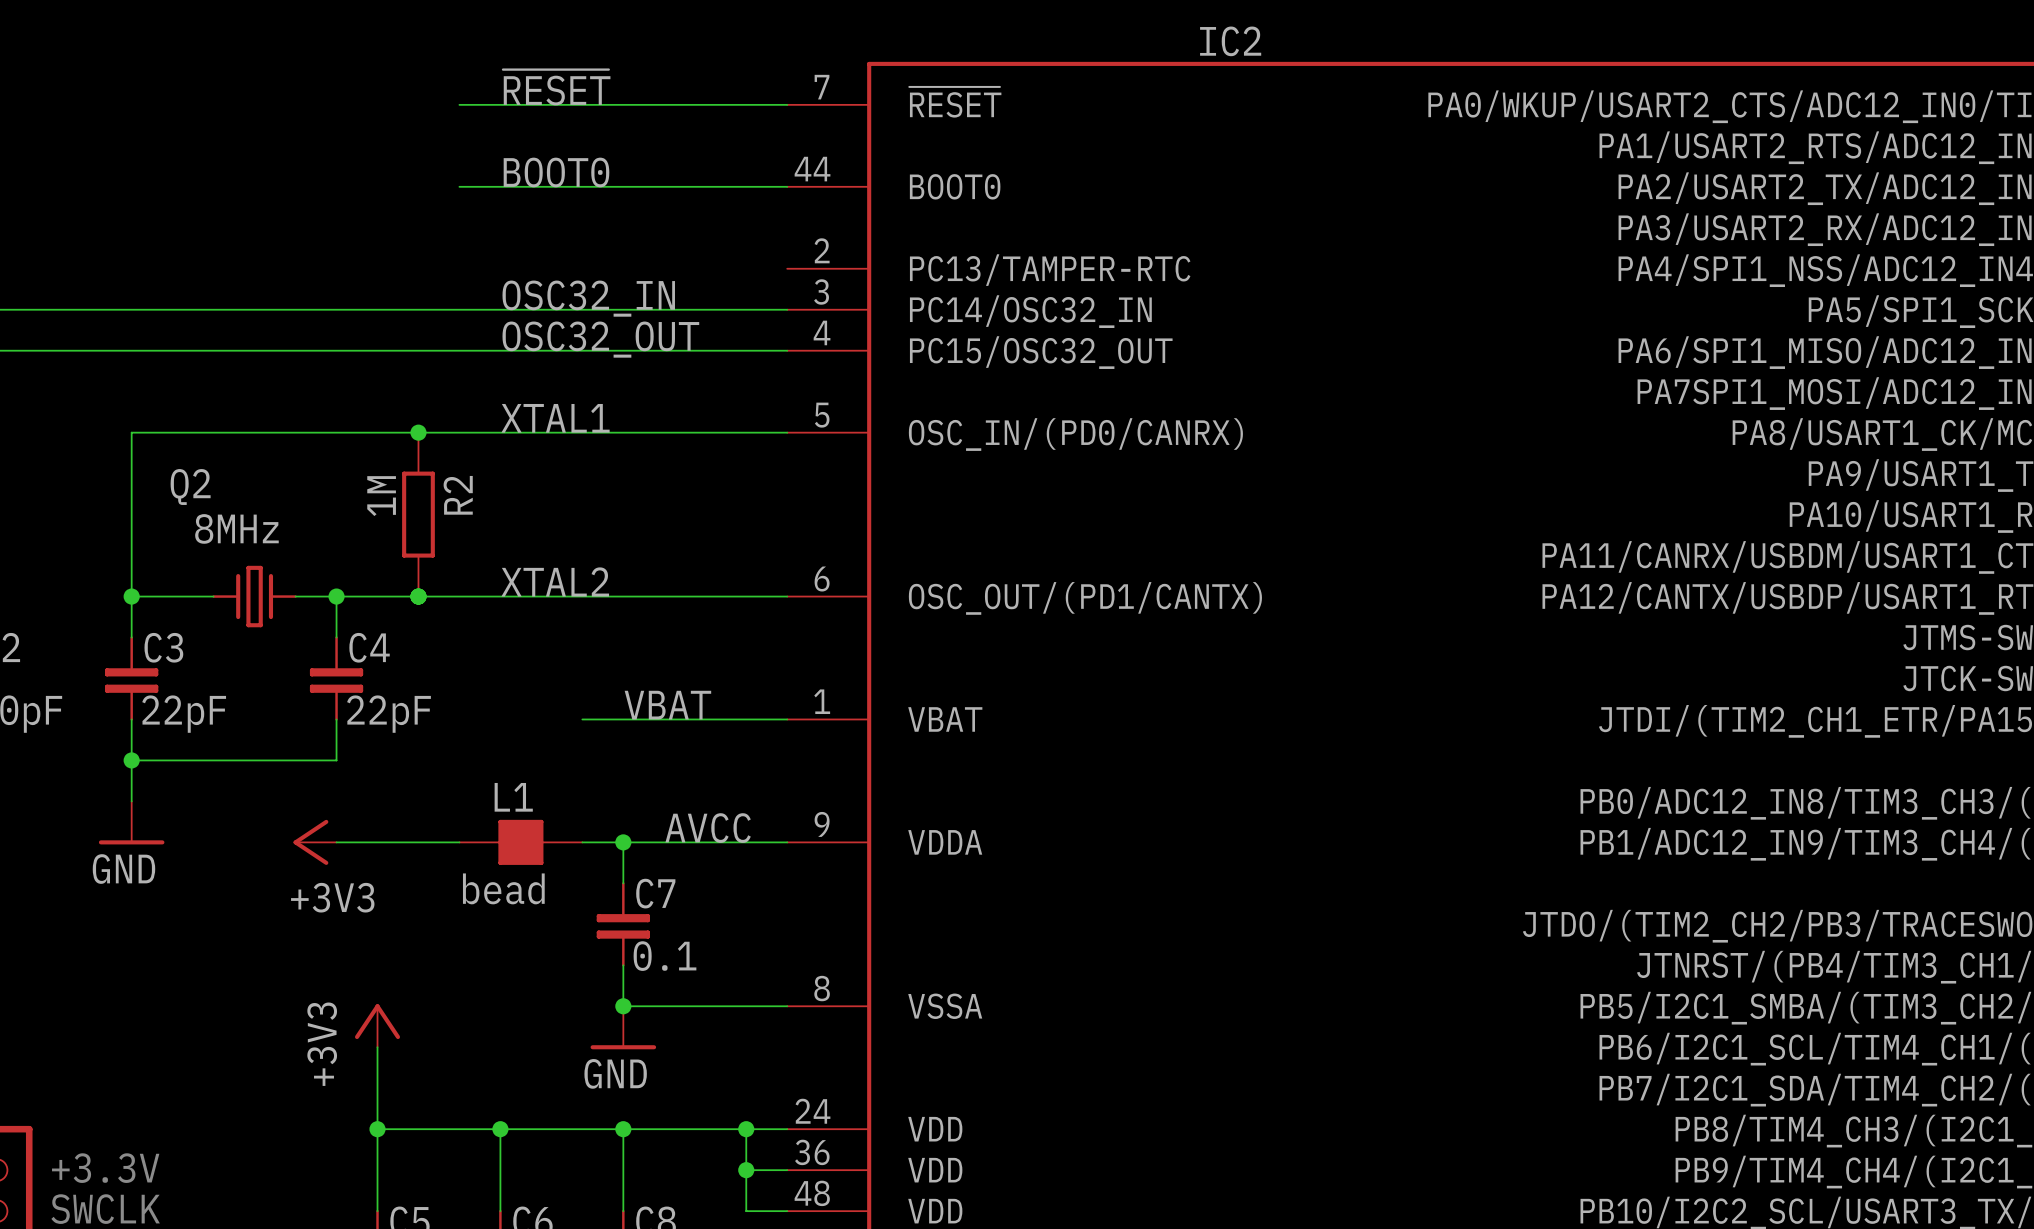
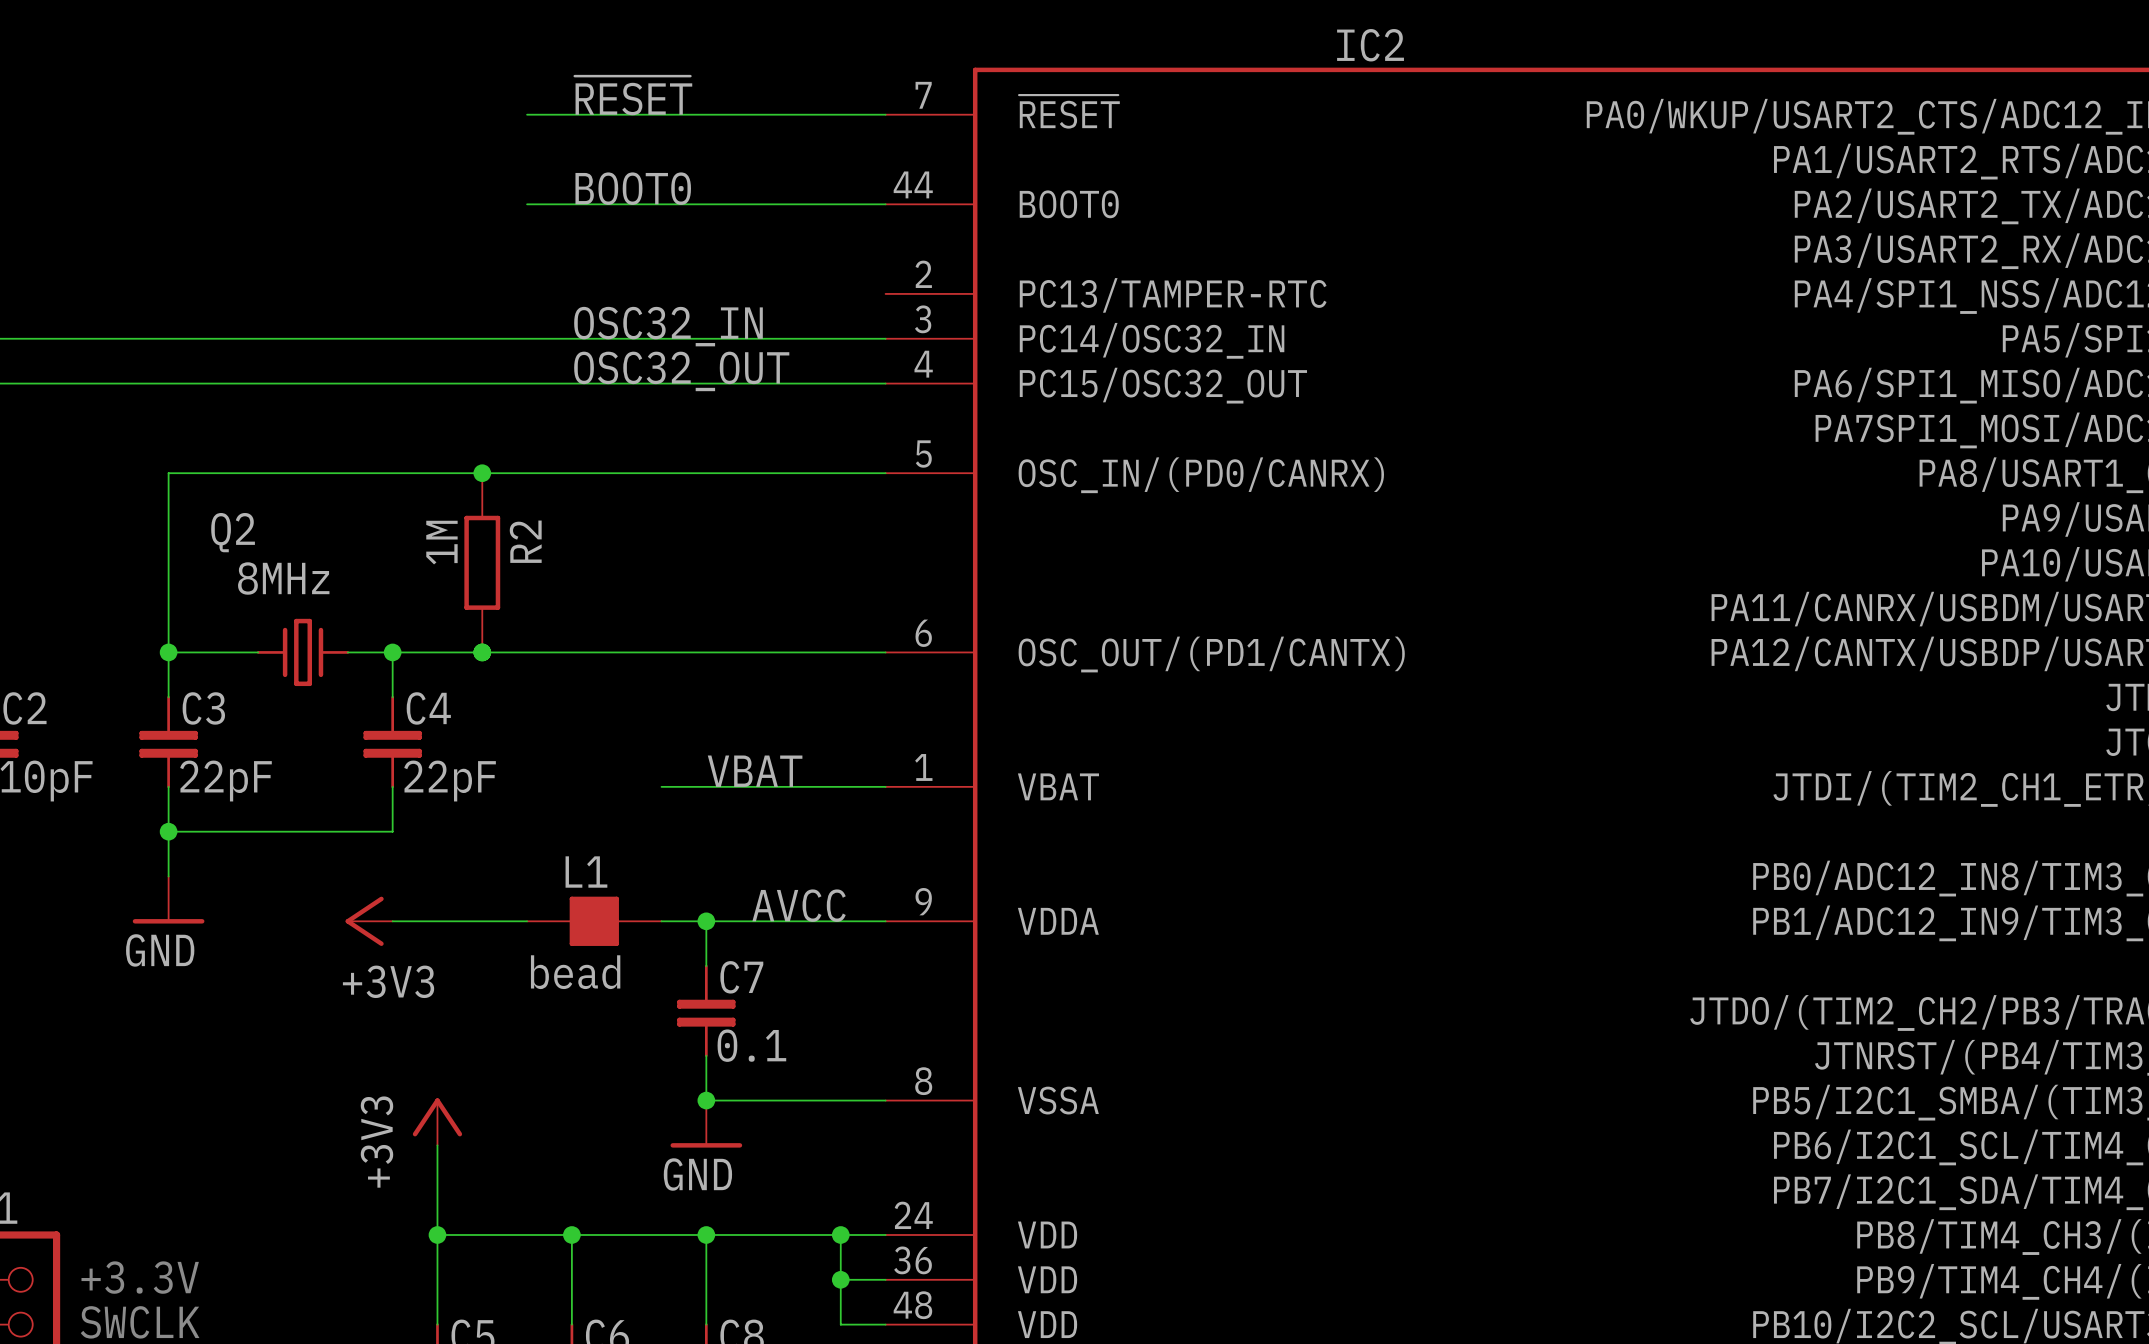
label: XTAL1 (555, 418) -> none
label: XTAL2 (555, 581) -> none

